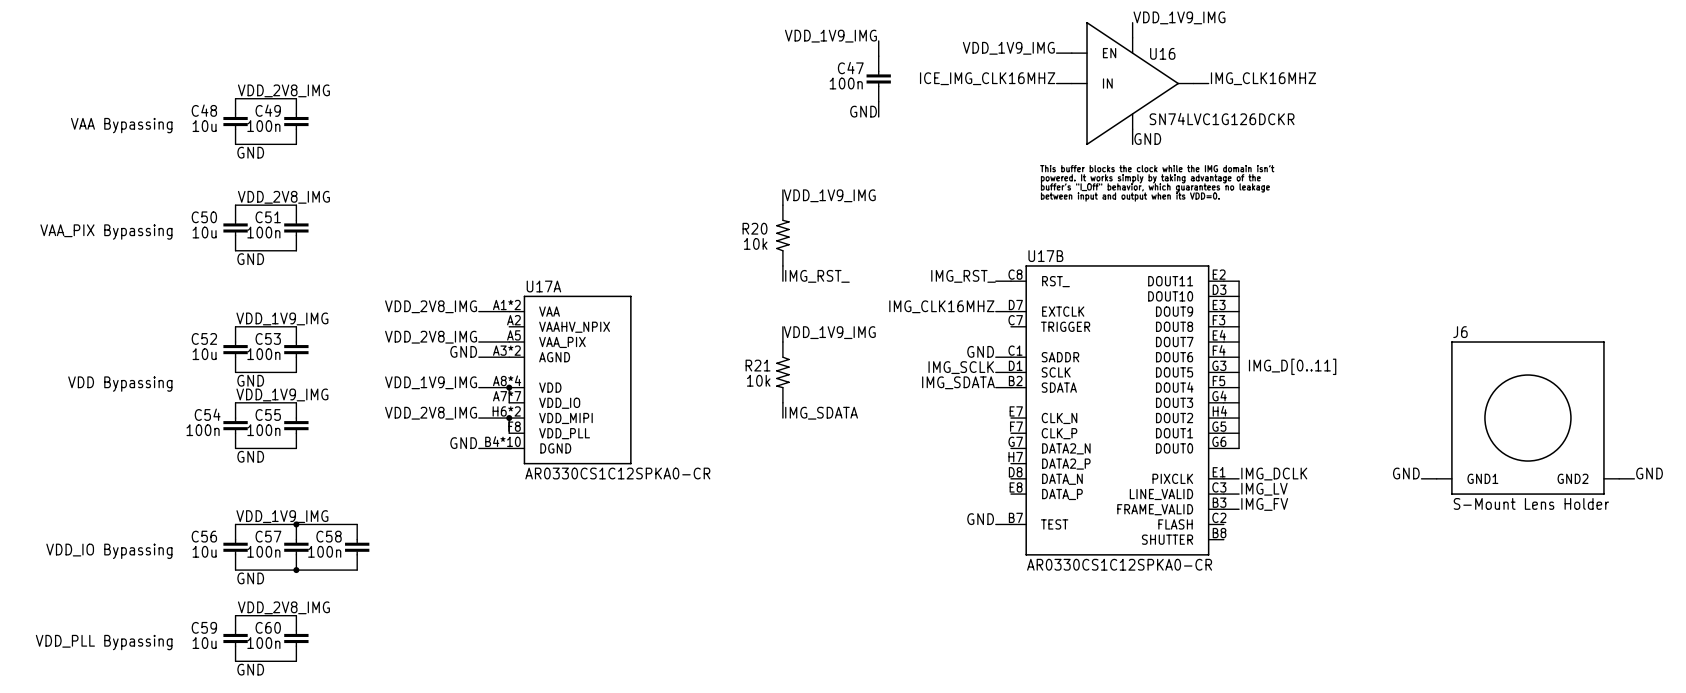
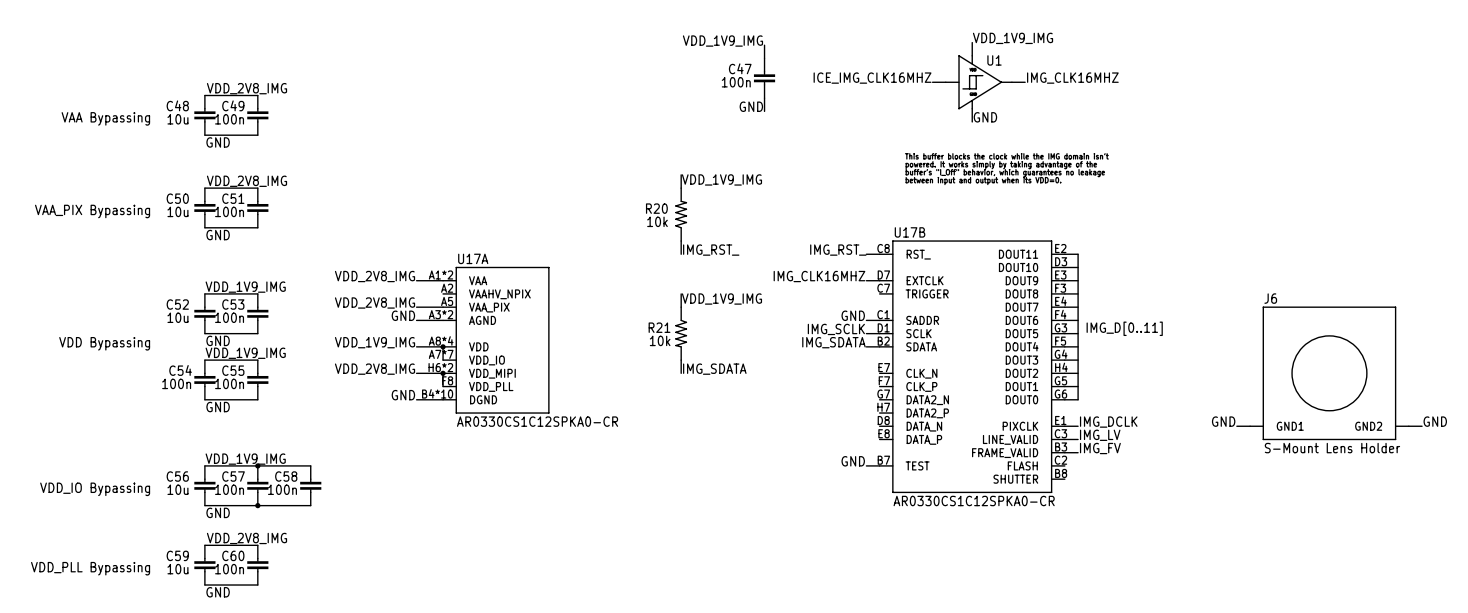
label position: VDD_1V9_IMG (1179, 17) -> VDD_1V9_IMG (1013, 38)
wire: (1132, 22) (1132, 37) -> (972, 42) (972, 55)
label: VDD_1V9_IMG (1008, 48) -> none
wire: (1056, 53) (1071, 53) -> none
label position: ICE_IMG_CLK16MHZ (987, 78) -> ICE_IMG_CLK16MHZ (872, 78)
label position: IMG_CLK16MHZ (1263, 78) -> IMG_CLK16MHZ (1072, 78)
U1: none -> (979, 82)
U16: (1132, 83) -> none
wire: (1193, 83) (1208, 83) -> (1011, 82) (1025, 82)
wire: (1132, 129) (1132, 144) -> (972, 108) (972, 121)
label position: GND (1147, 139) -> GND (985, 117)

